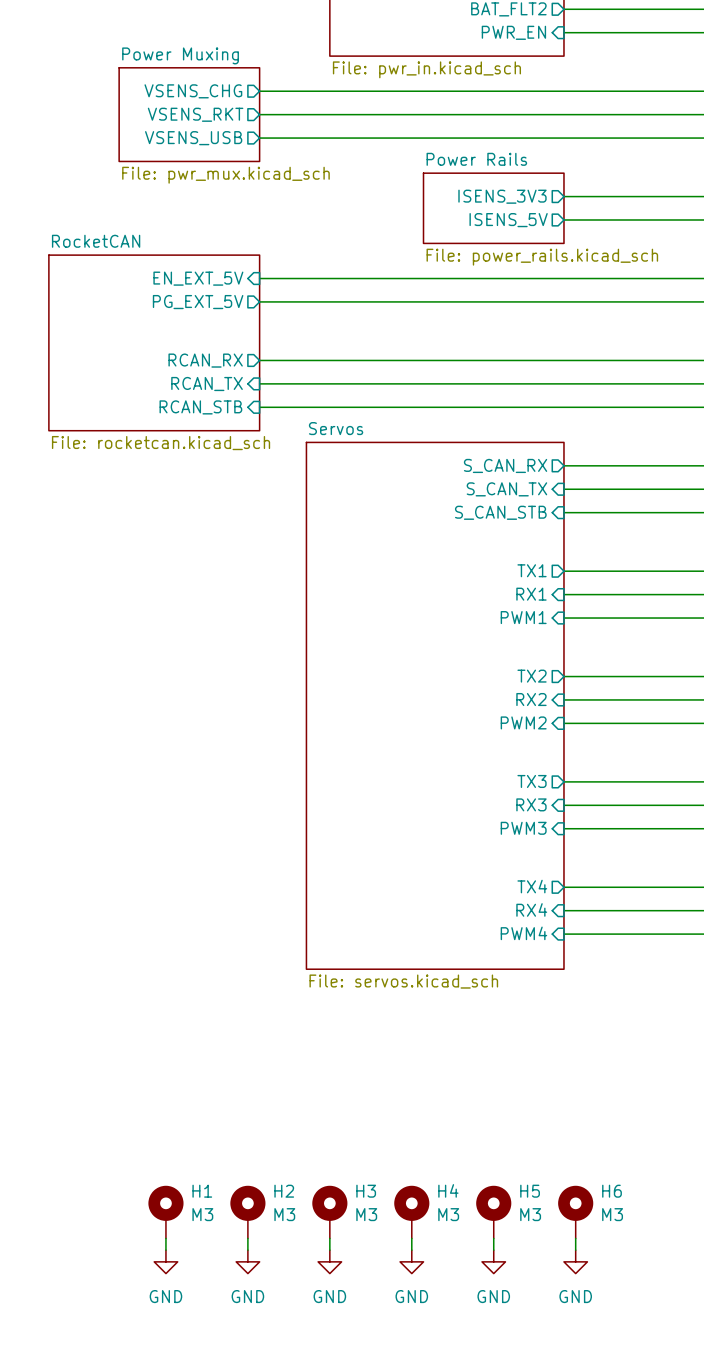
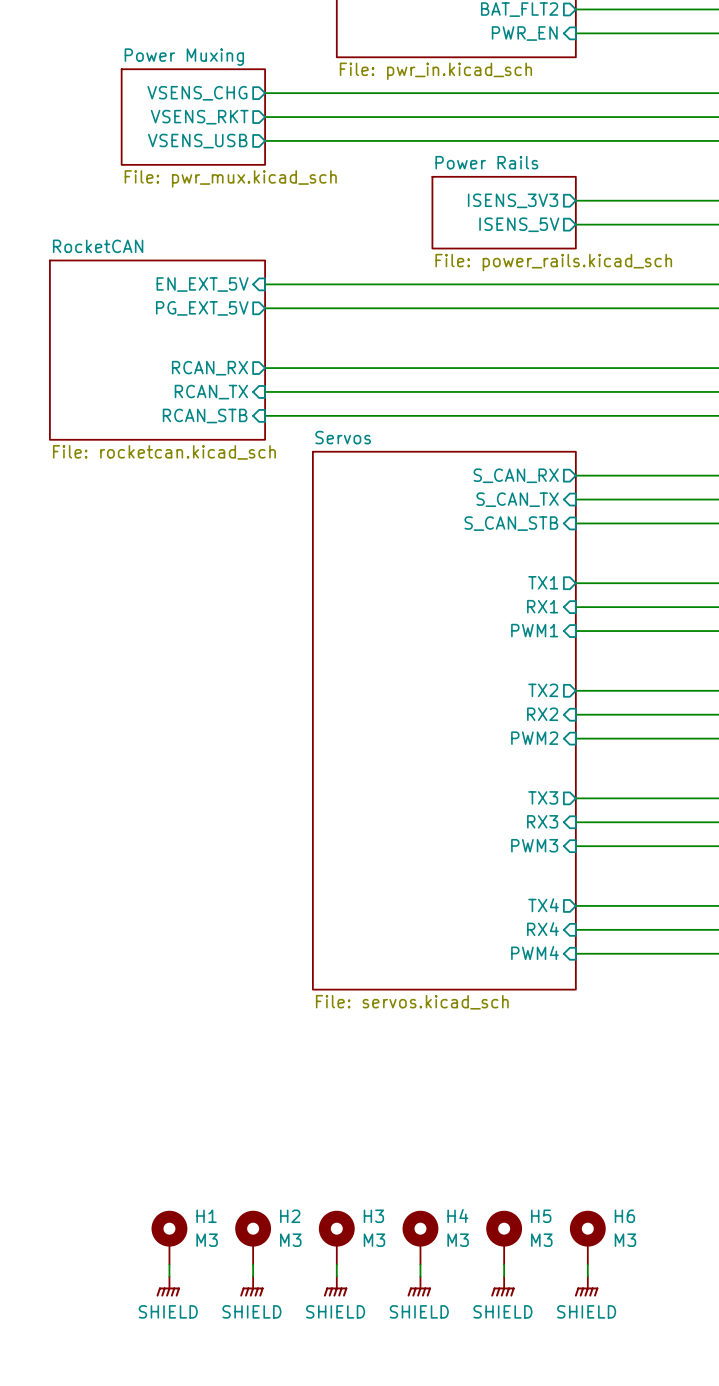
power symbol: GND (165, 1261) -> SHIELD (168, 1286)
power symbol: GND (247, 1261) -> SHIELD (251, 1286)
power symbol: GND (329, 1261) -> SHIELD (335, 1286)
power symbol: GND (411, 1261) -> SHIELD (419, 1286)
power symbol: GND (493, 1261) -> SHIELD (502, 1286)
power symbol: GND (575, 1261) -> SHIELD (586, 1286)

